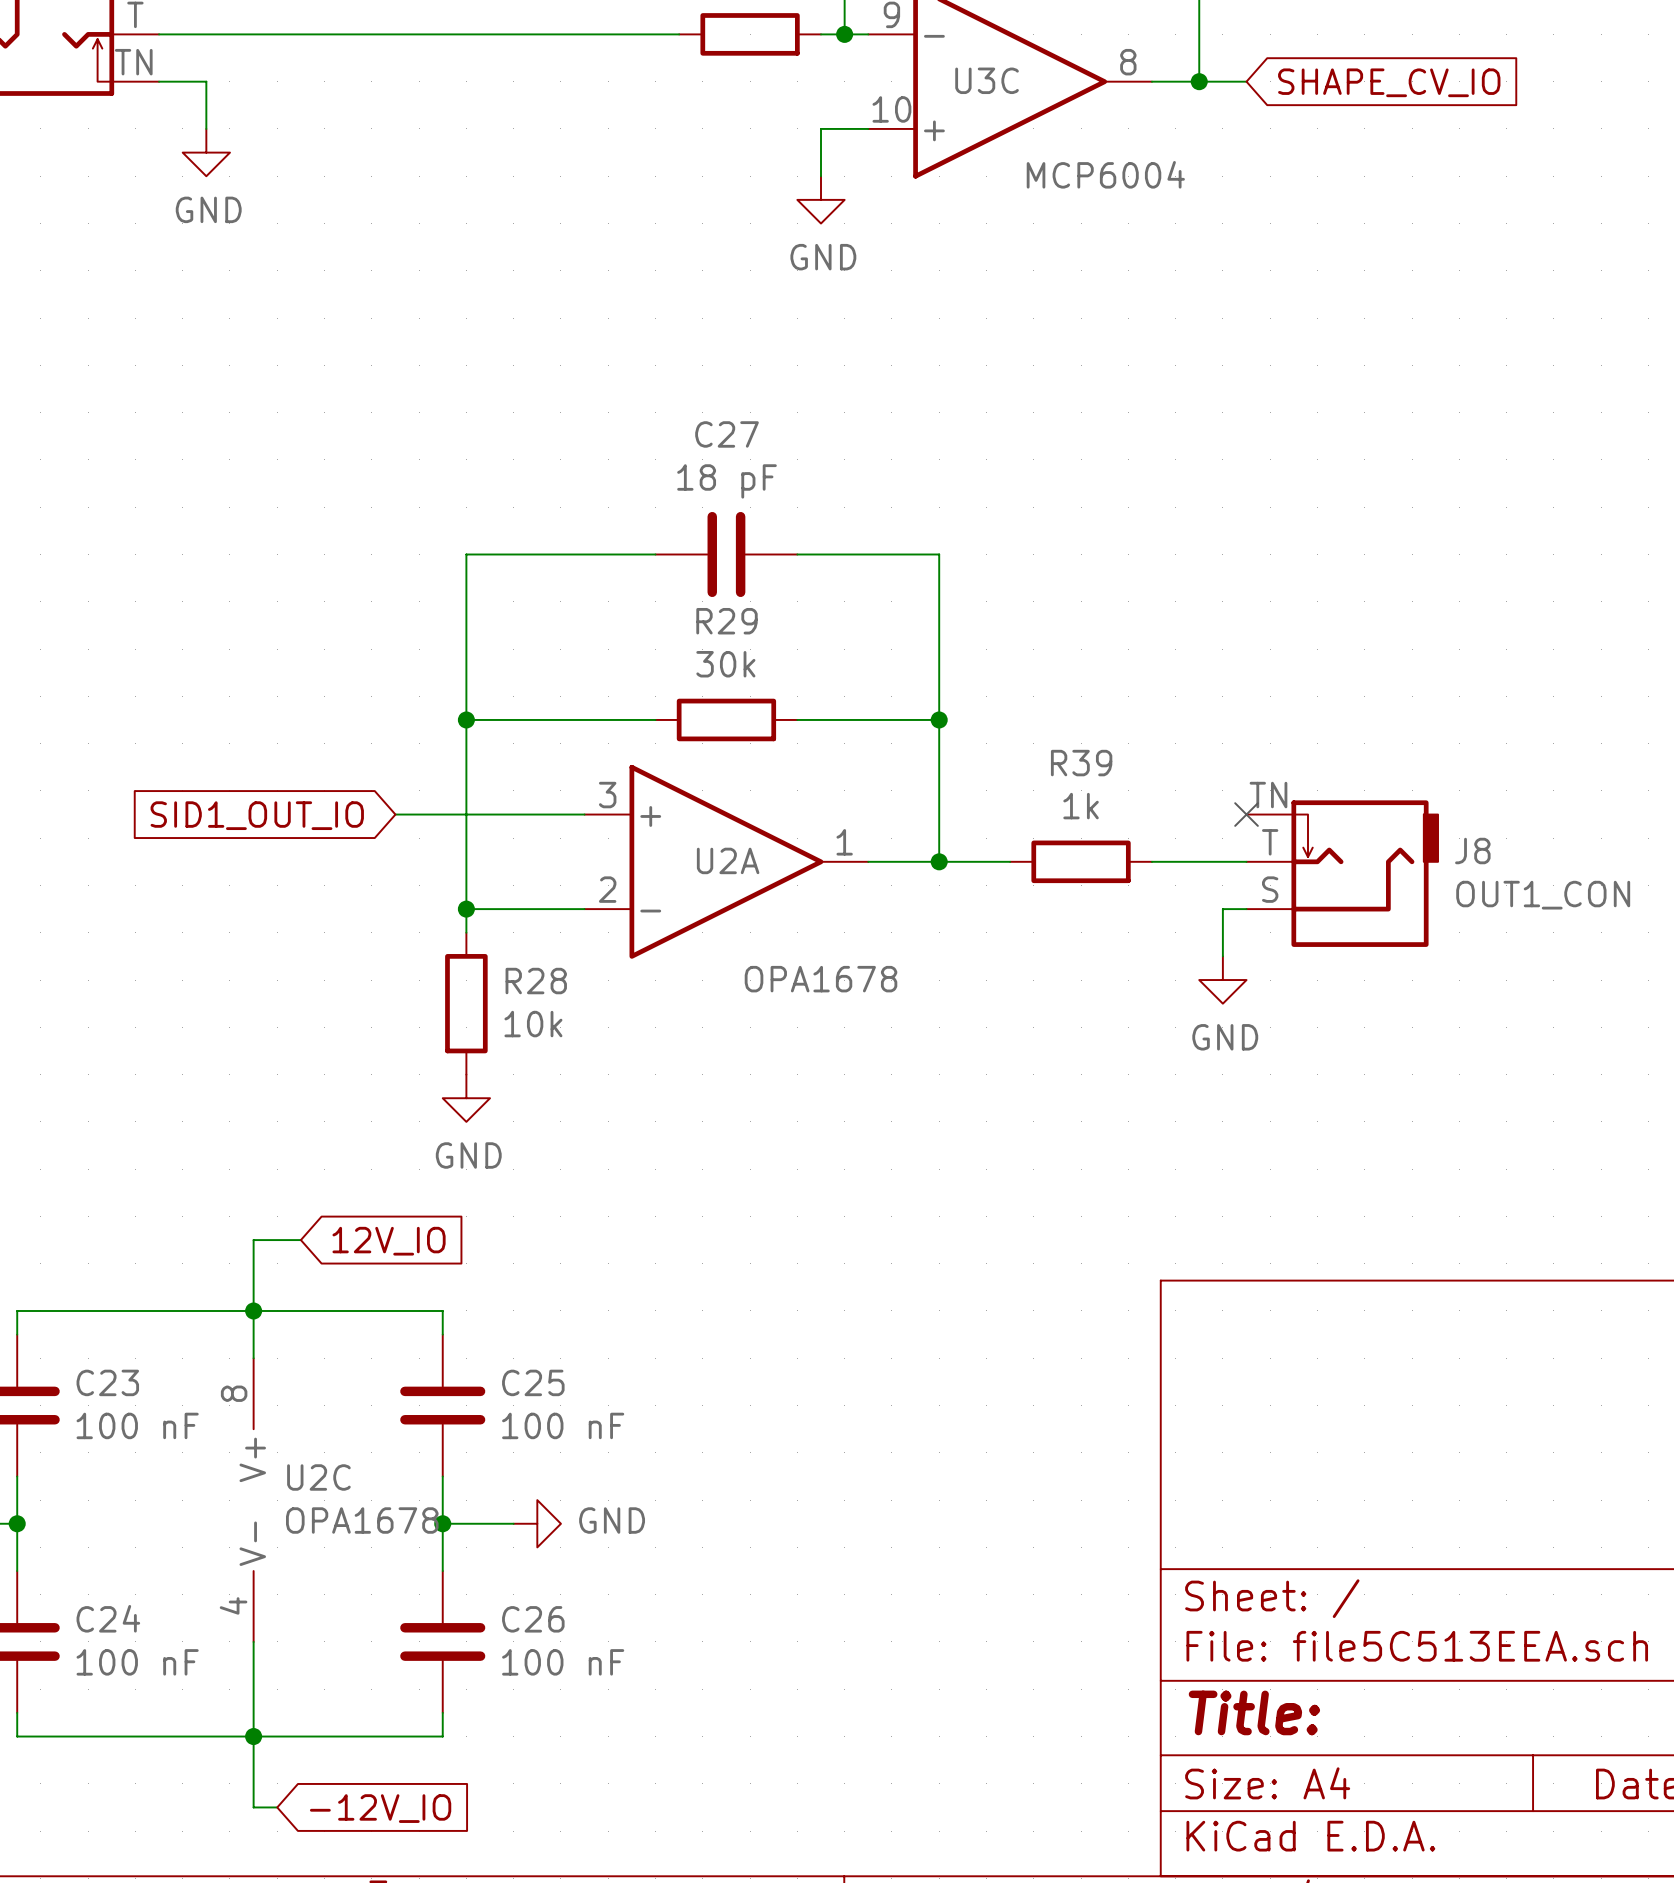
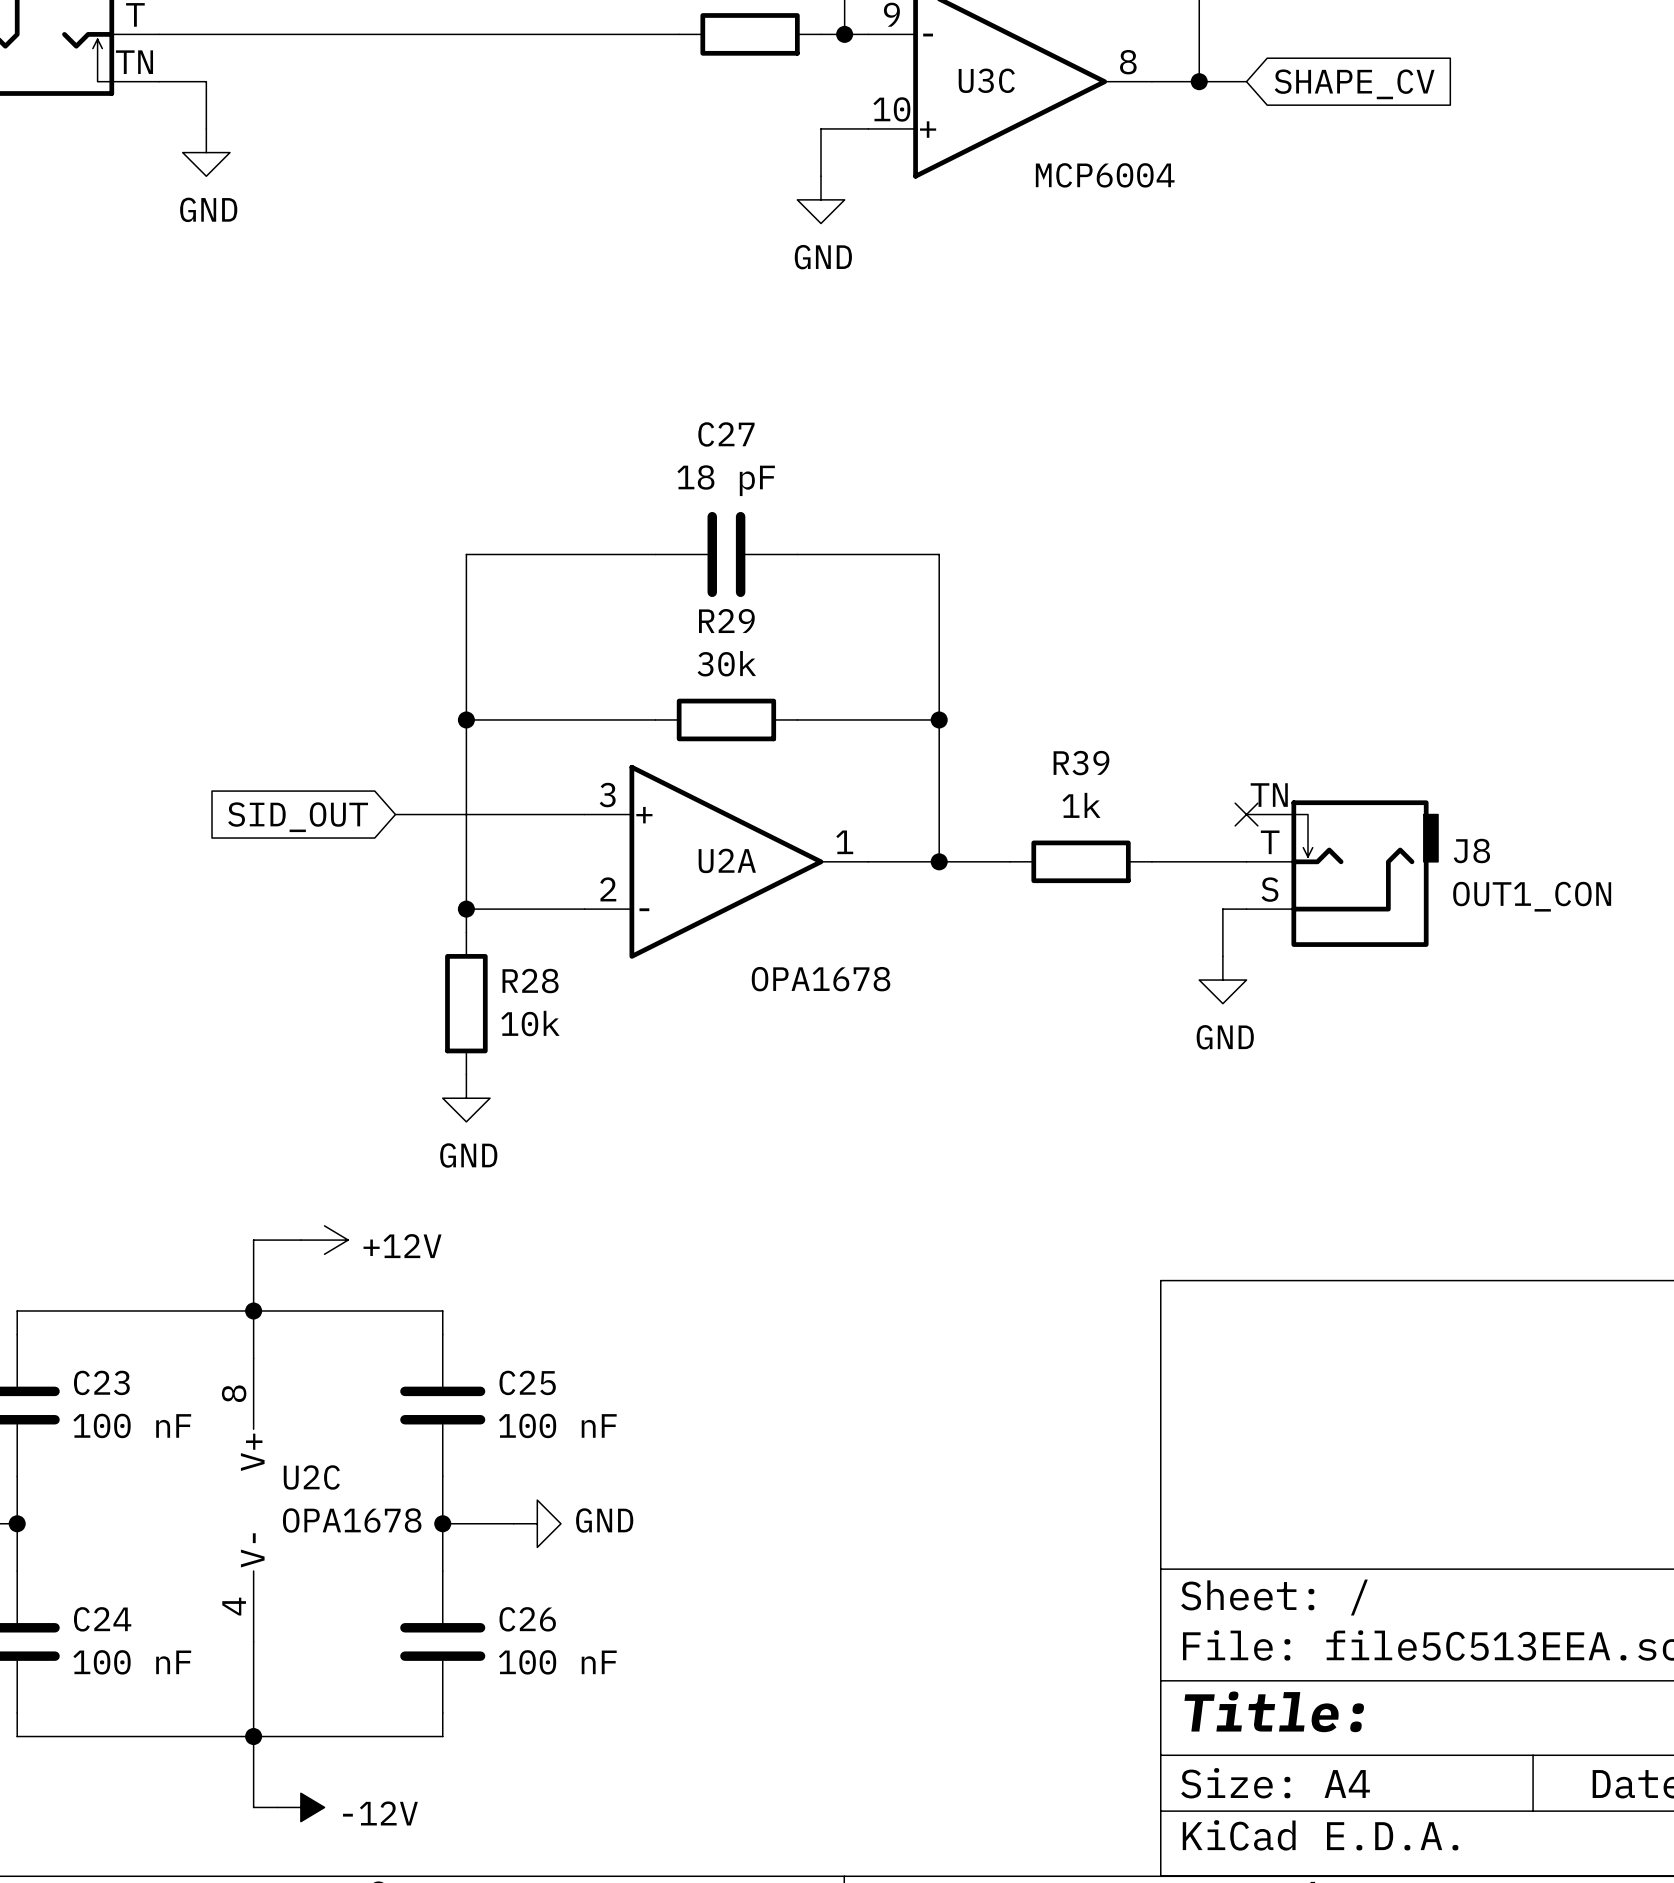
global label: SHAPE_CV_IO (1389, 82) -> SHAPE_CV (1354, 84)
global label: SID1_OUT_IO (257, 815) -> SID_OUT (298, 817)
power symbol: none -> +12V (324, 1240)
global label: 12V_IO (389, 1241) -> none
power symbol: none -> -12V (300, 1807)
global label: -12V_IO (380, 1808) -> none

